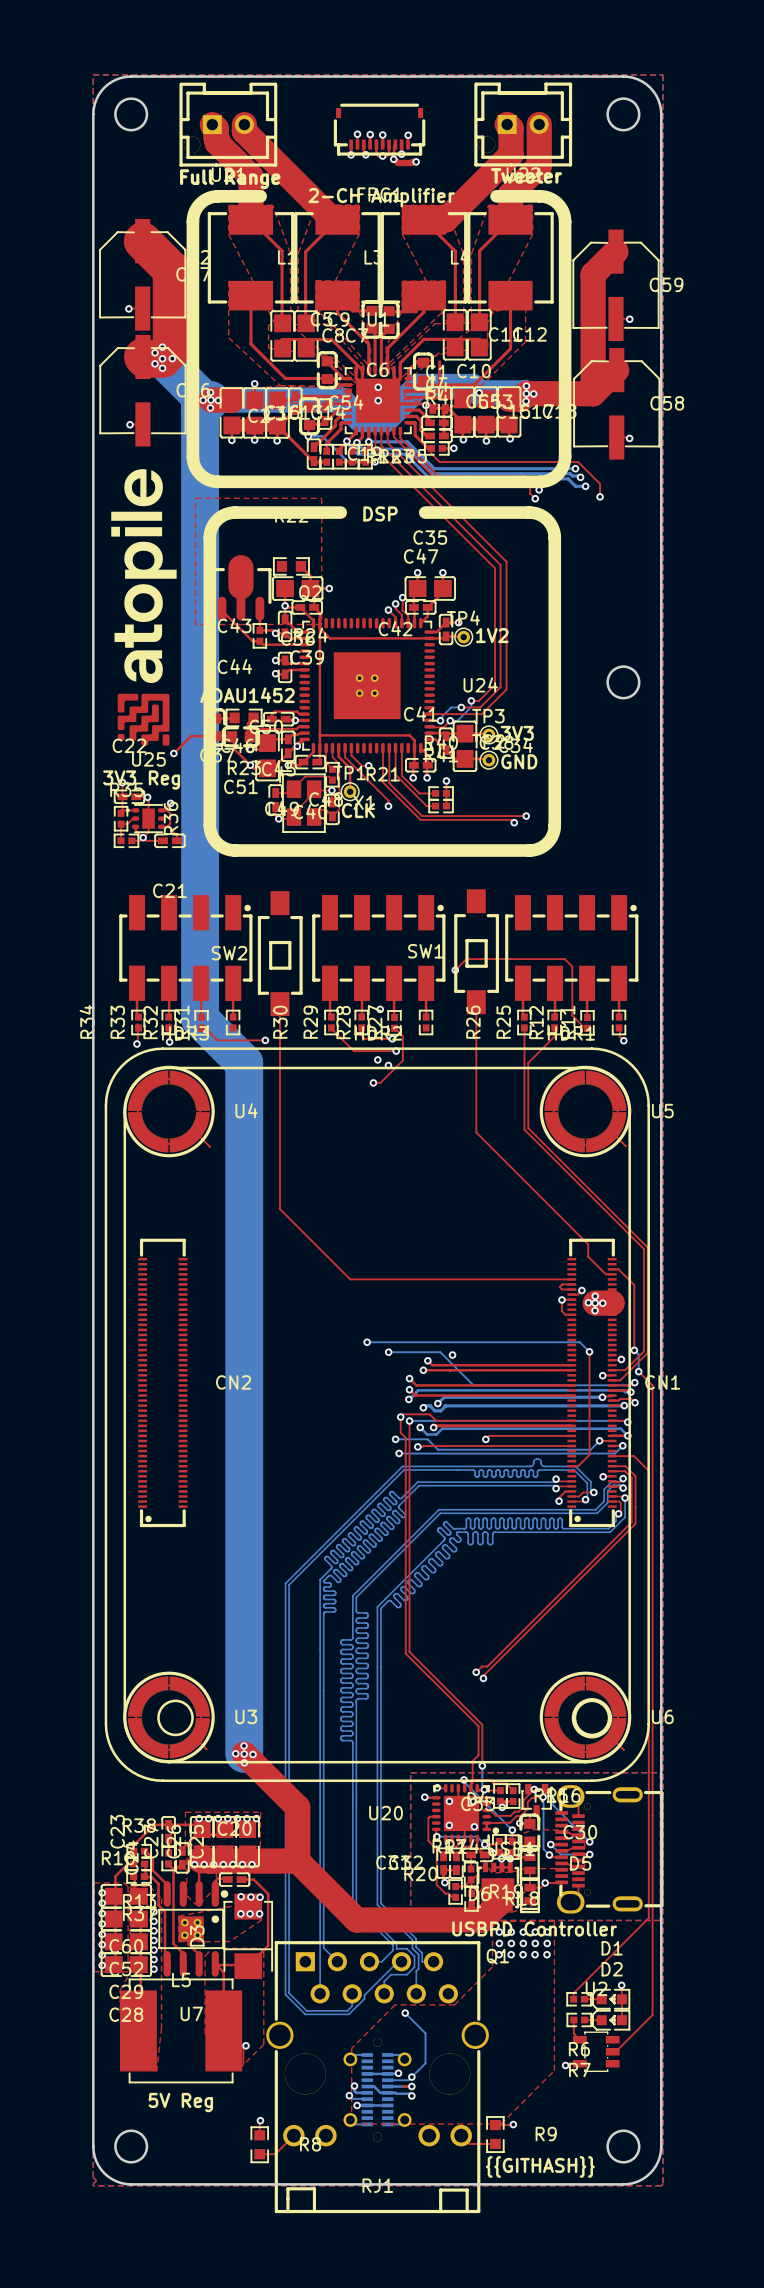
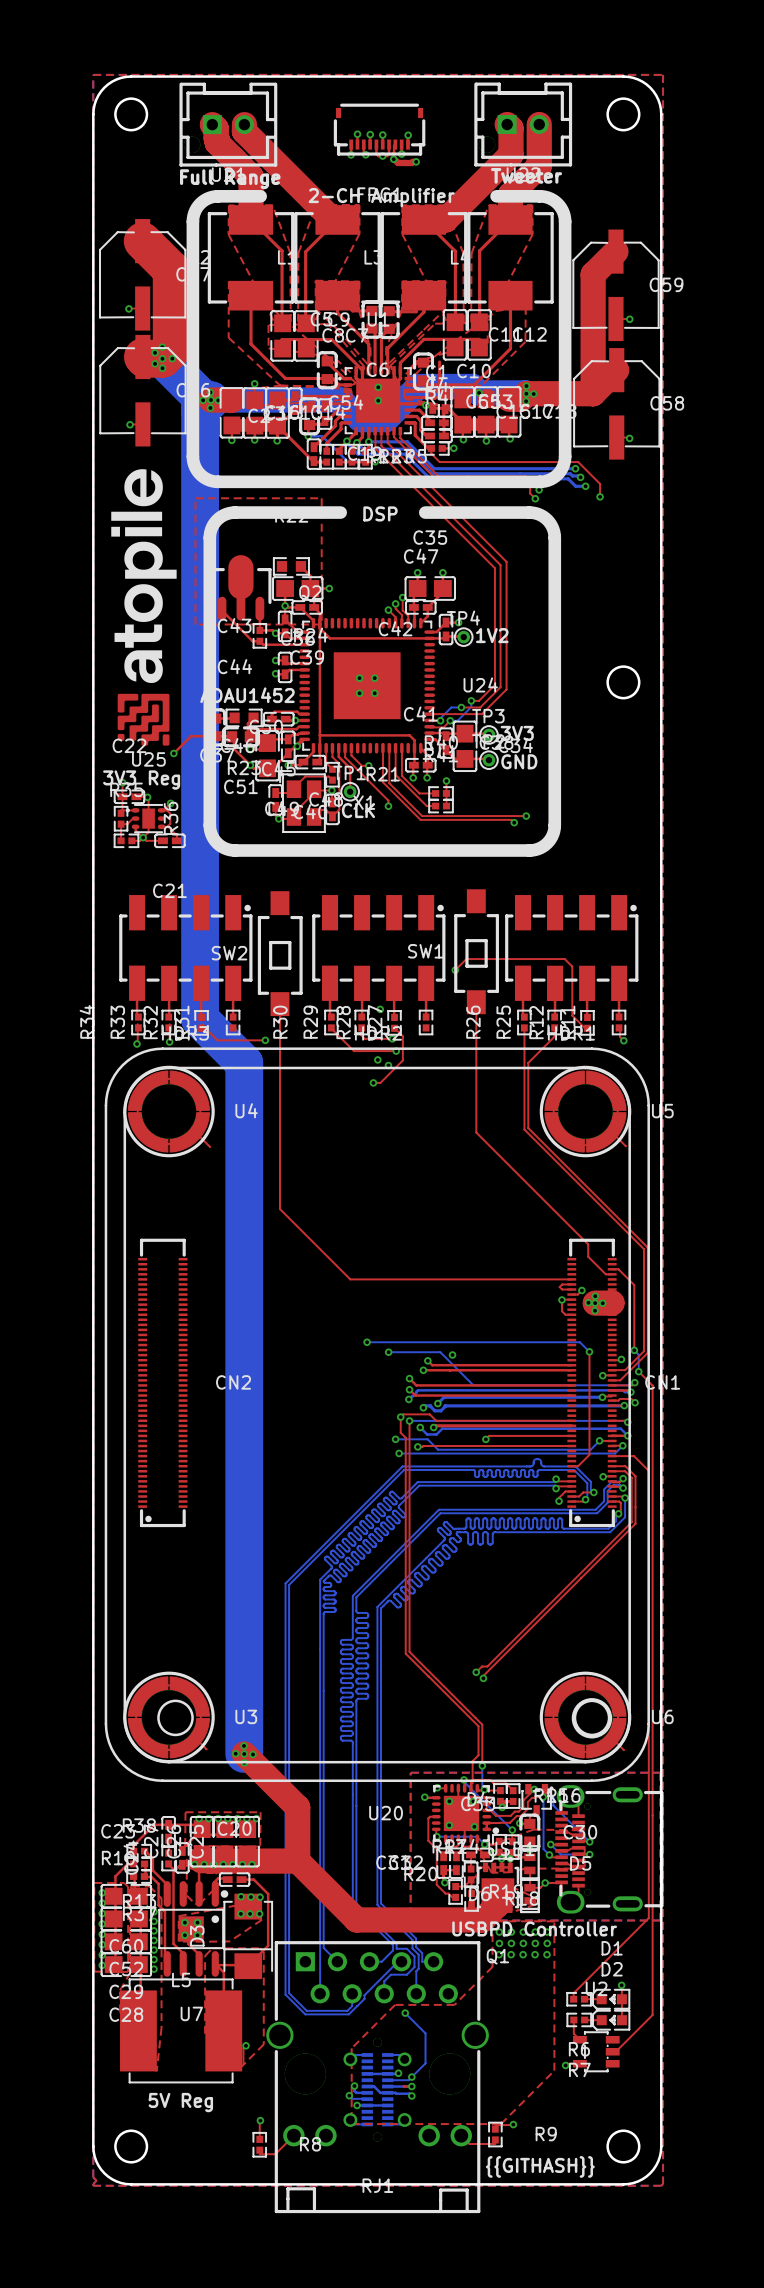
C23 name rotation: 0° (117, 1831) -> 90° clockwise (118, 1831)
R9 footprint: [486, 2116, 505, 2154] -> [488, 2121, 503, 2148]
R8 footprint: [250, 2126, 270, 2164] -> [252, 2131, 267, 2158]

